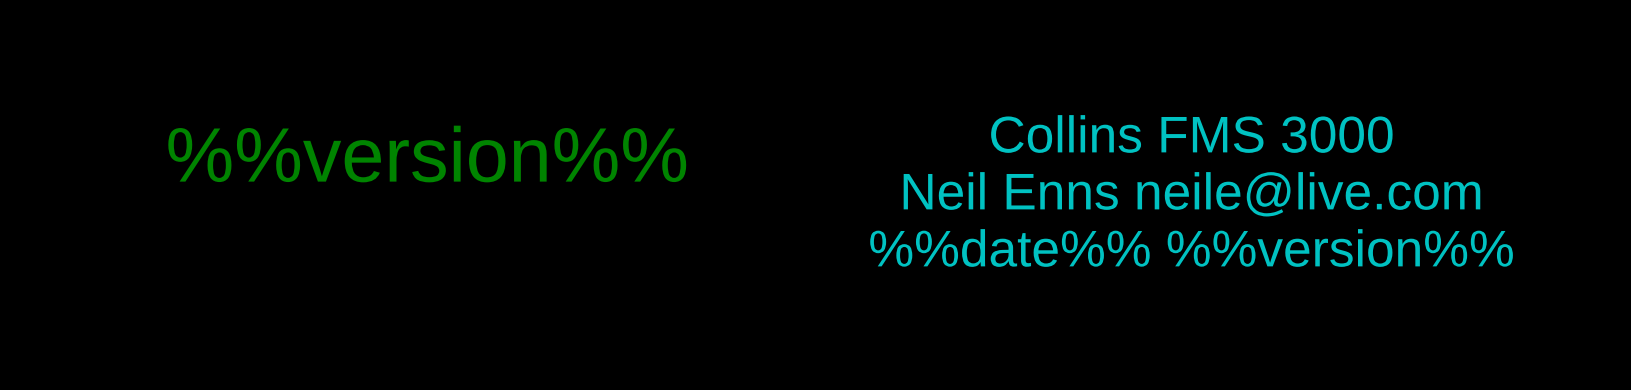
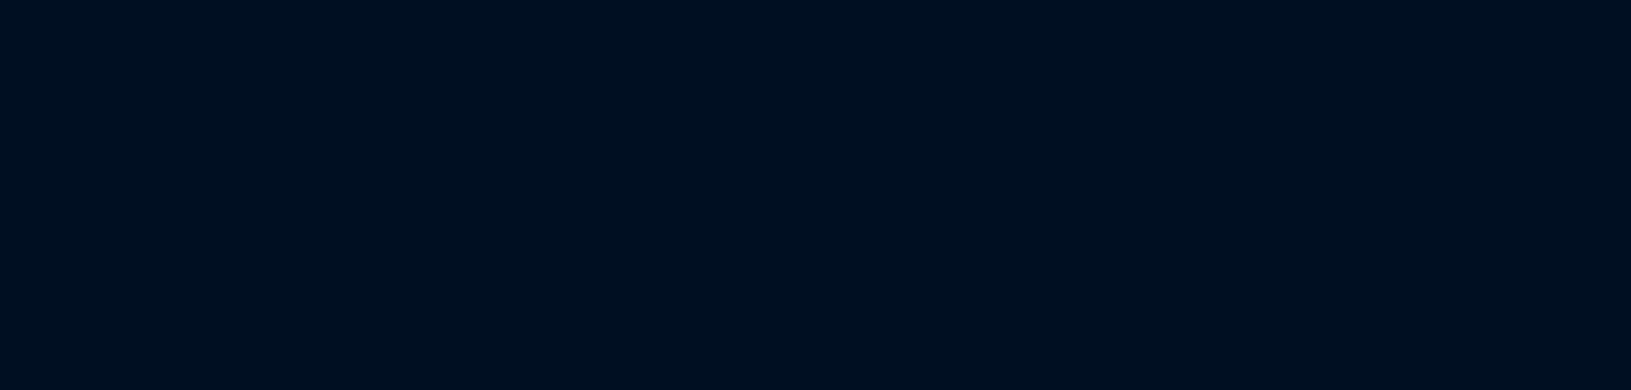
text: Collins FMS 3000 (1191, 133) -> none
text: %%version%% (427, 154) -> none
text: Neil Enns neile@live.com (1191, 194) -> none
text: %%date%% %%version%% (1191, 247) -> none

